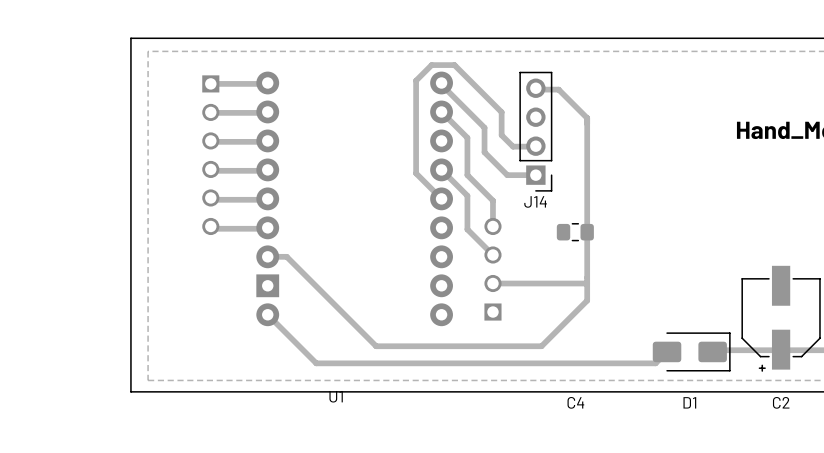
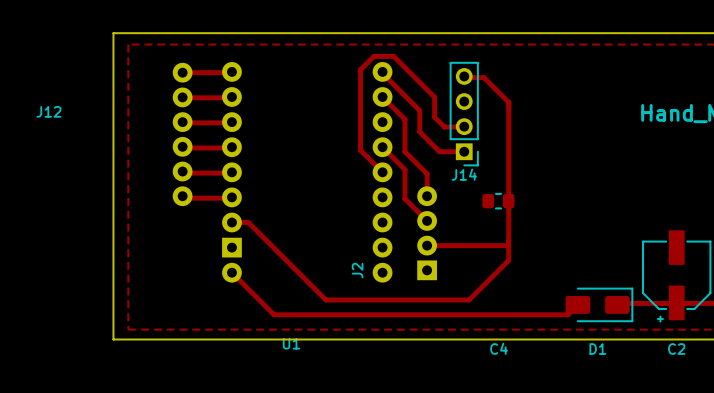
part: (210, 155) -> none
J12: none -> (182, 134)
part: (492, 269) -> none
J2: none -> (427, 233)

